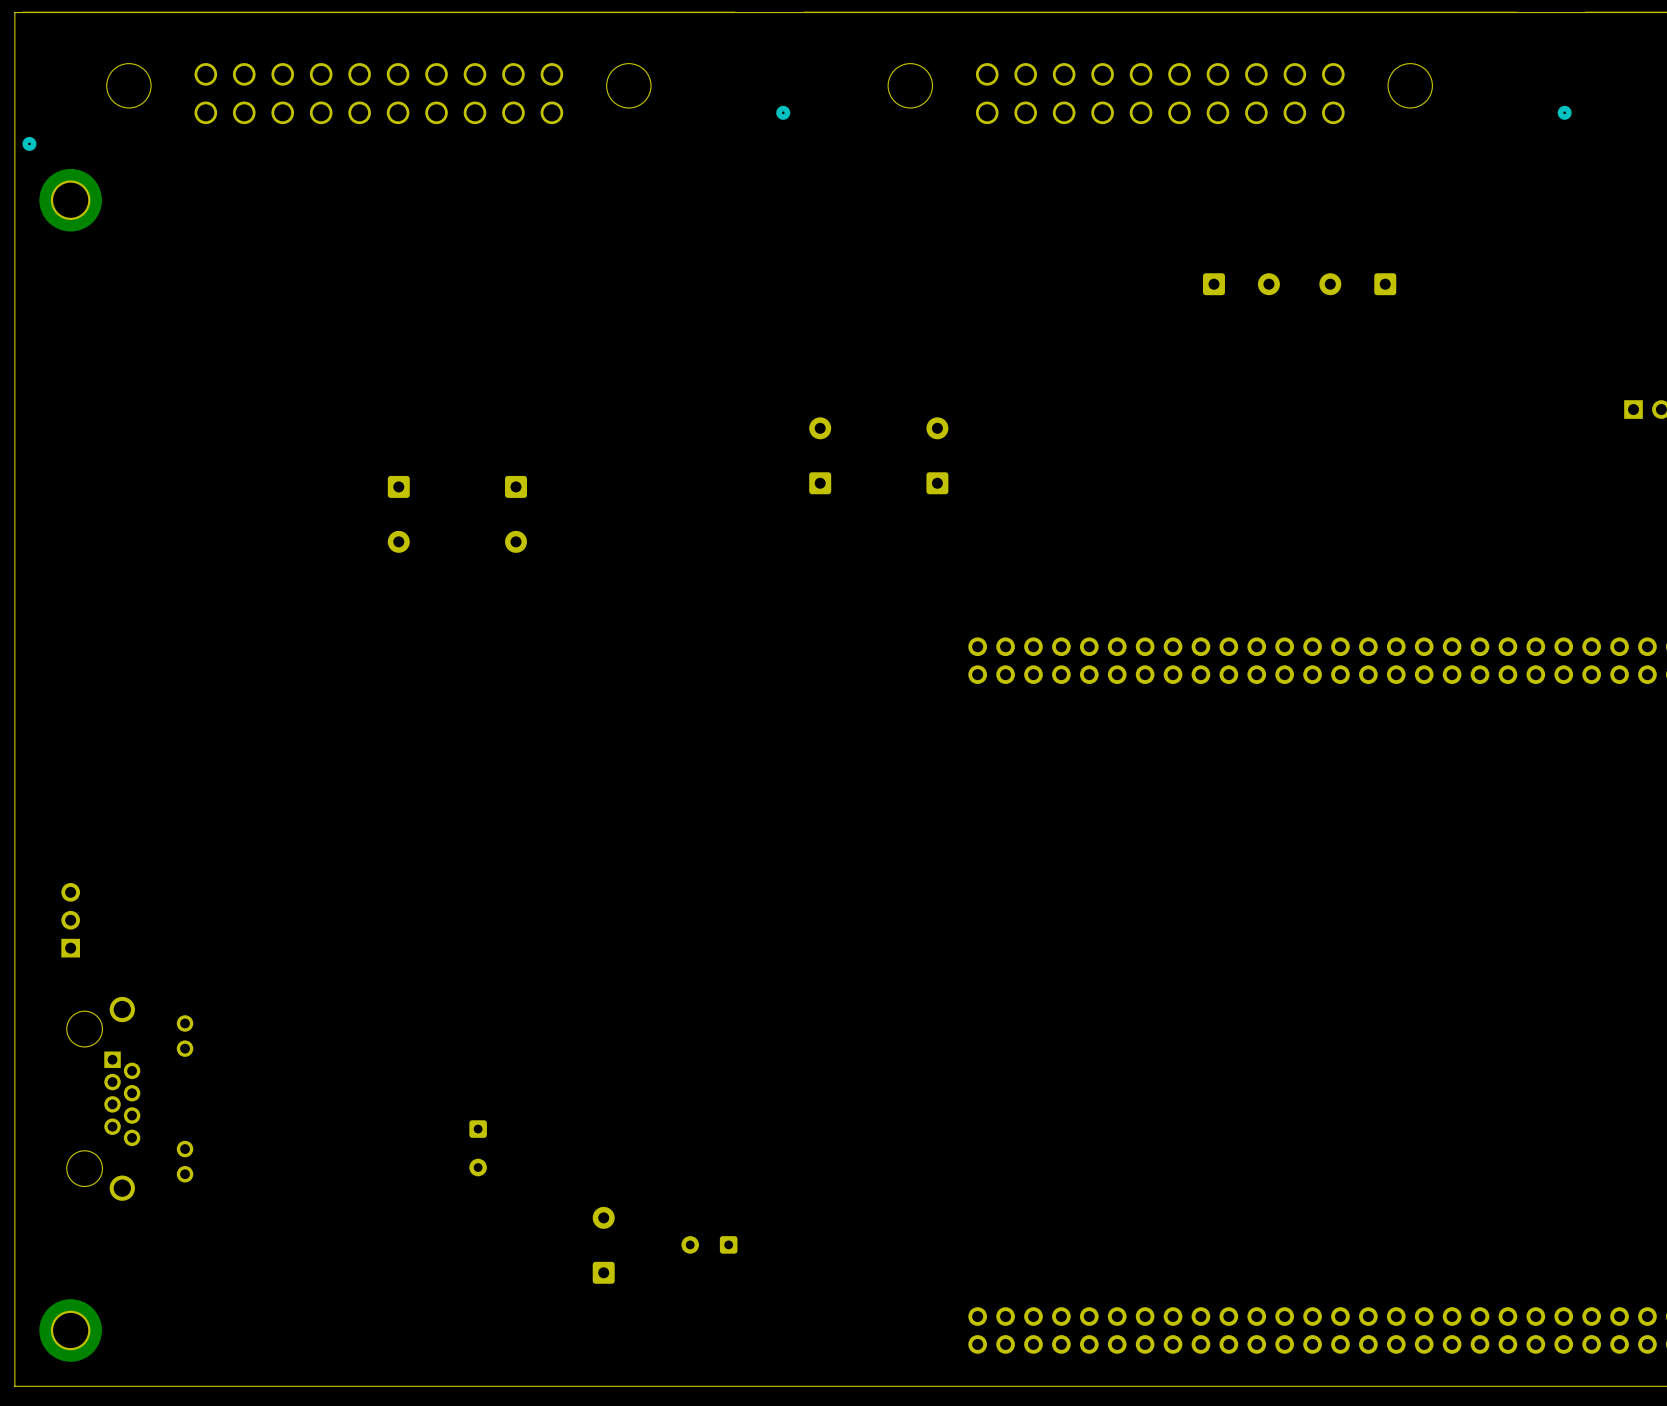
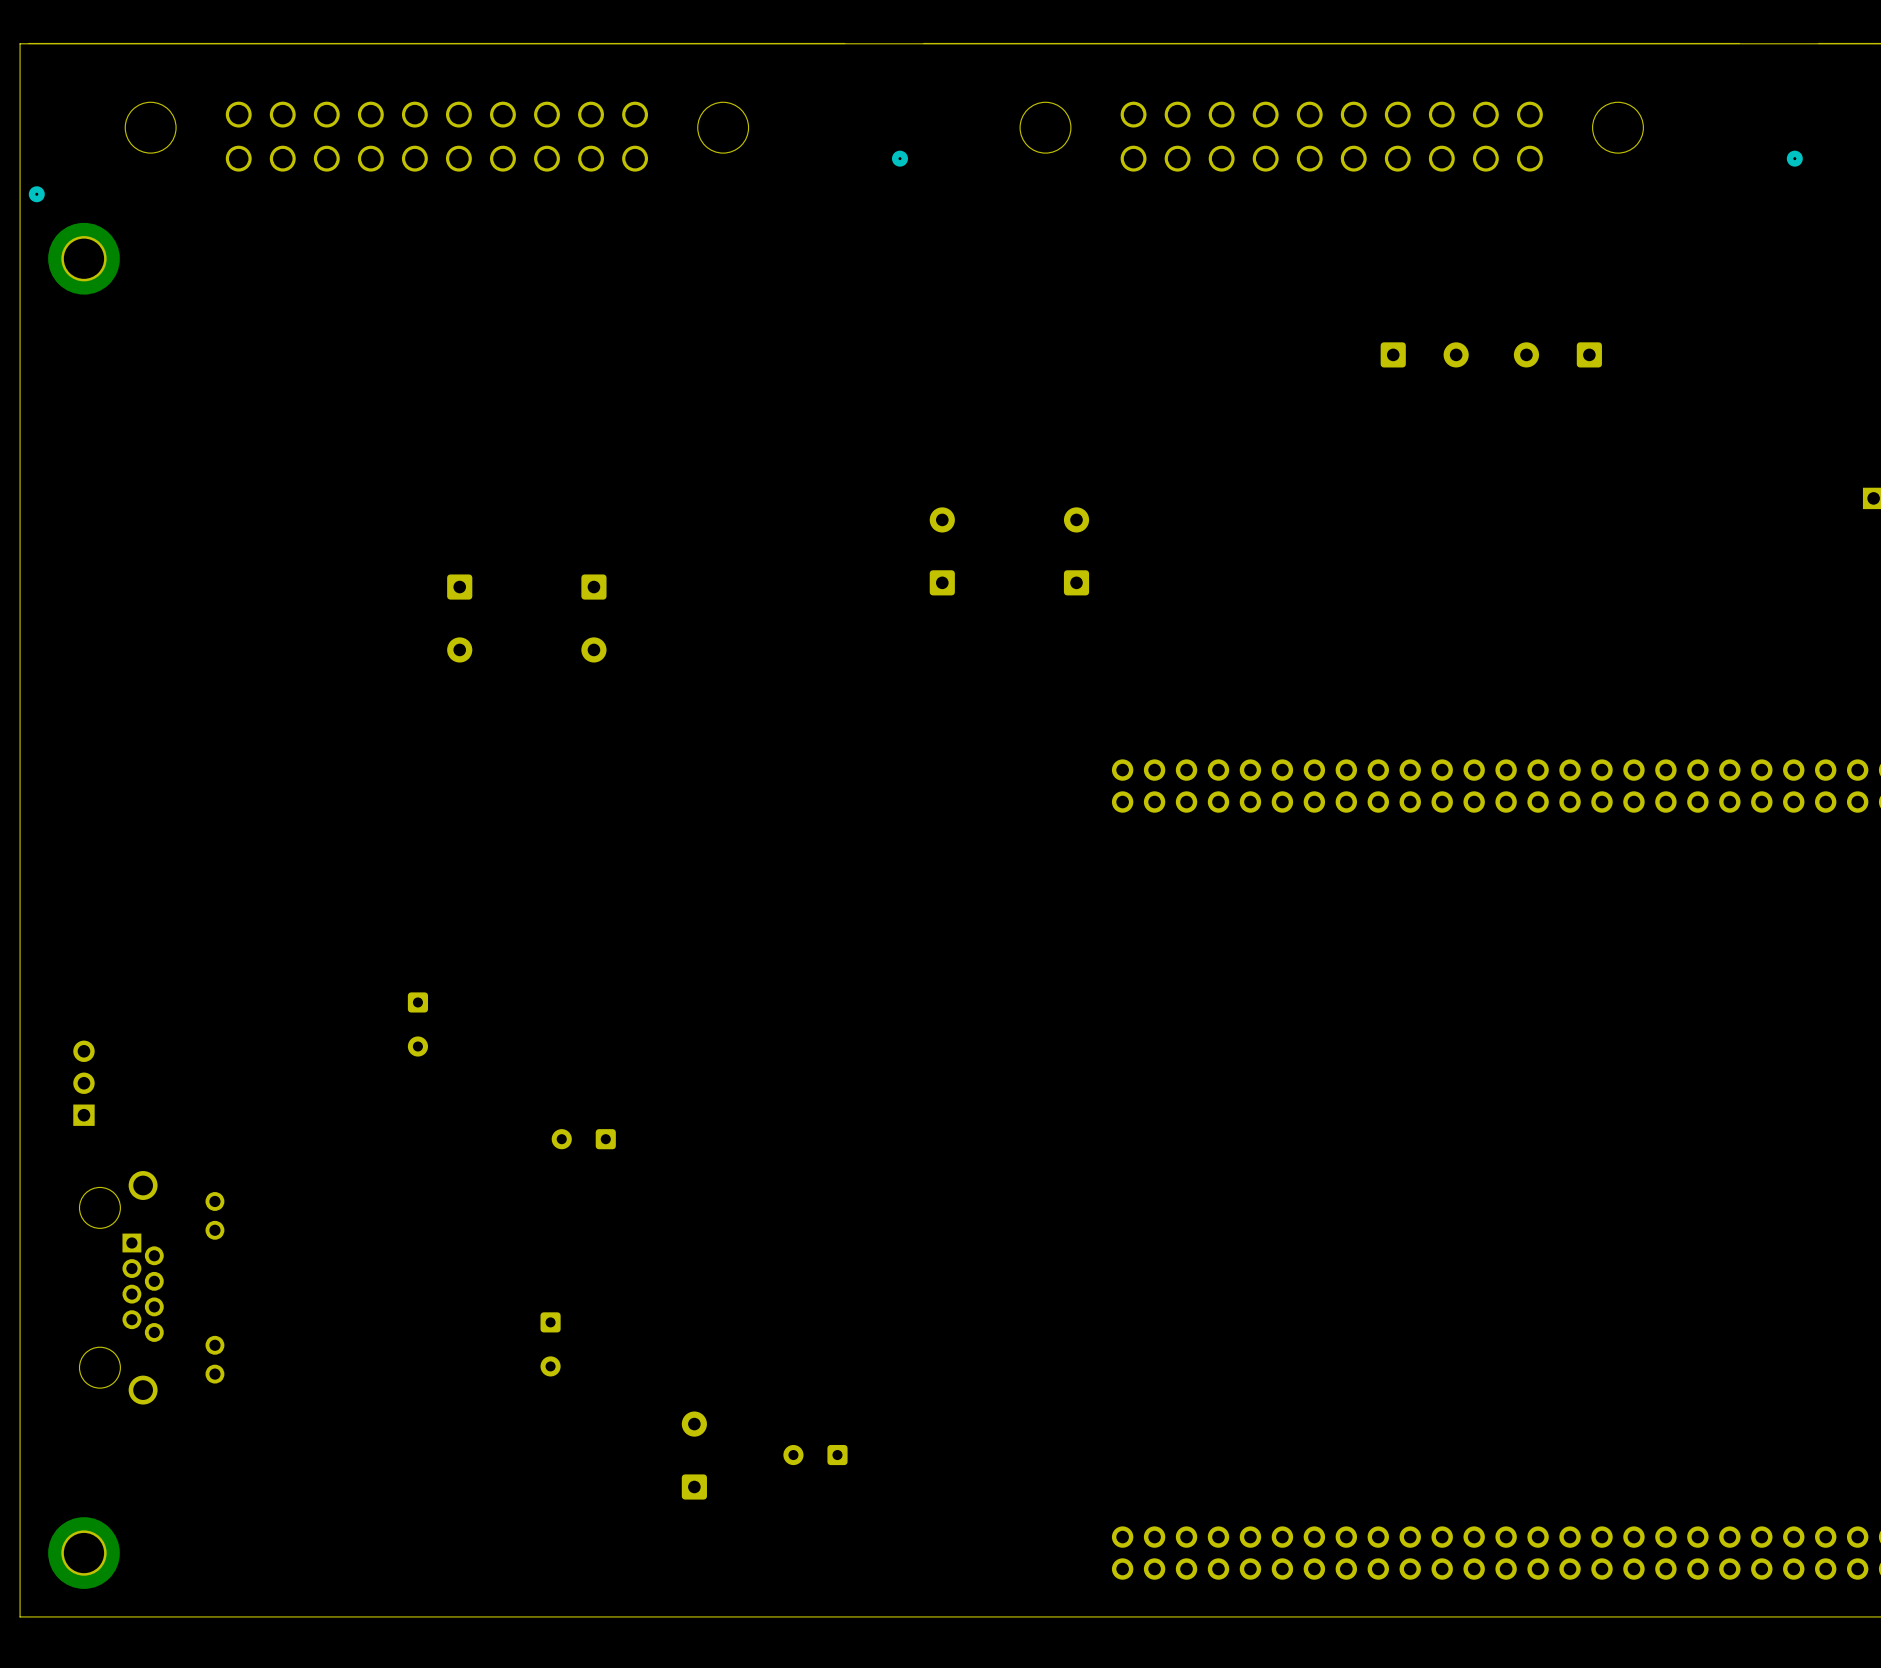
part: none -> (417, 1024)
part: none -> (583, 1139)

